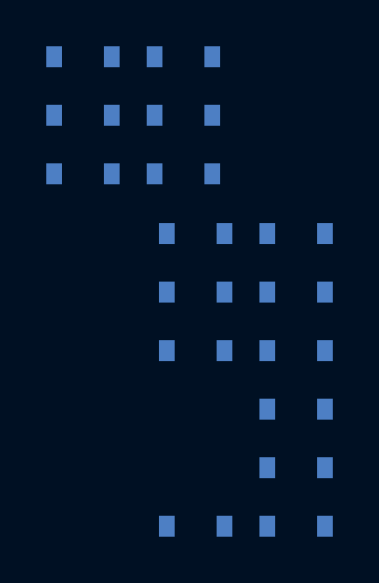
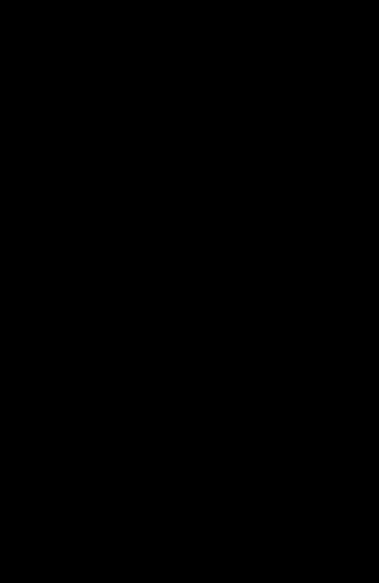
part: (82, 56) -> none
part: (183, 56) -> none
part: (82, 115) -> none
part: (183, 115) -> none
part: (82, 173) -> none
part: (183, 173) -> none
part: (195, 233) -> none
part: (296, 233) -> none
part: (195, 292) -> none
part: (296, 292) -> none
part: (195, 350) -> none
part: (296, 350) -> none
part: (296, 409) -> none
part: (296, 467) -> none
part: (195, 526) -> none
part: (296, 526) -> none

